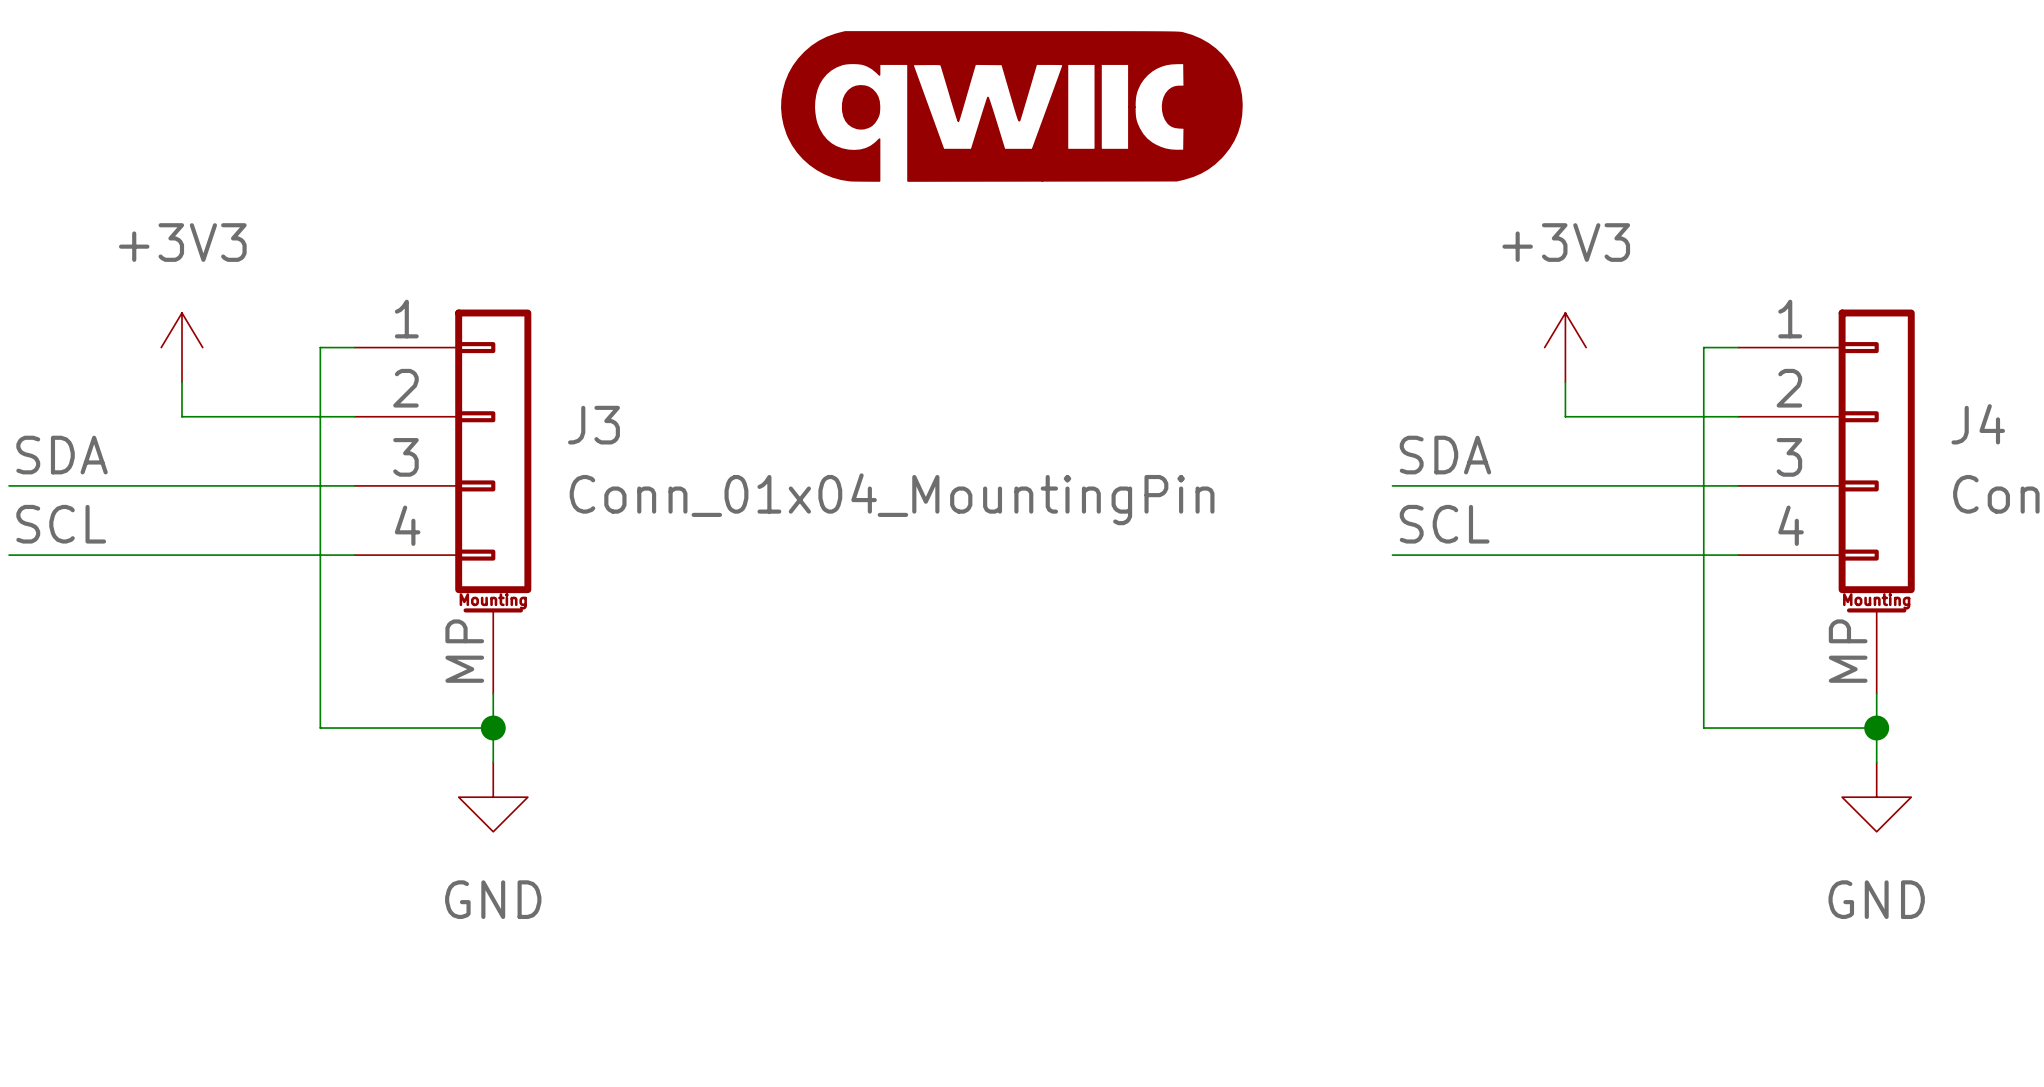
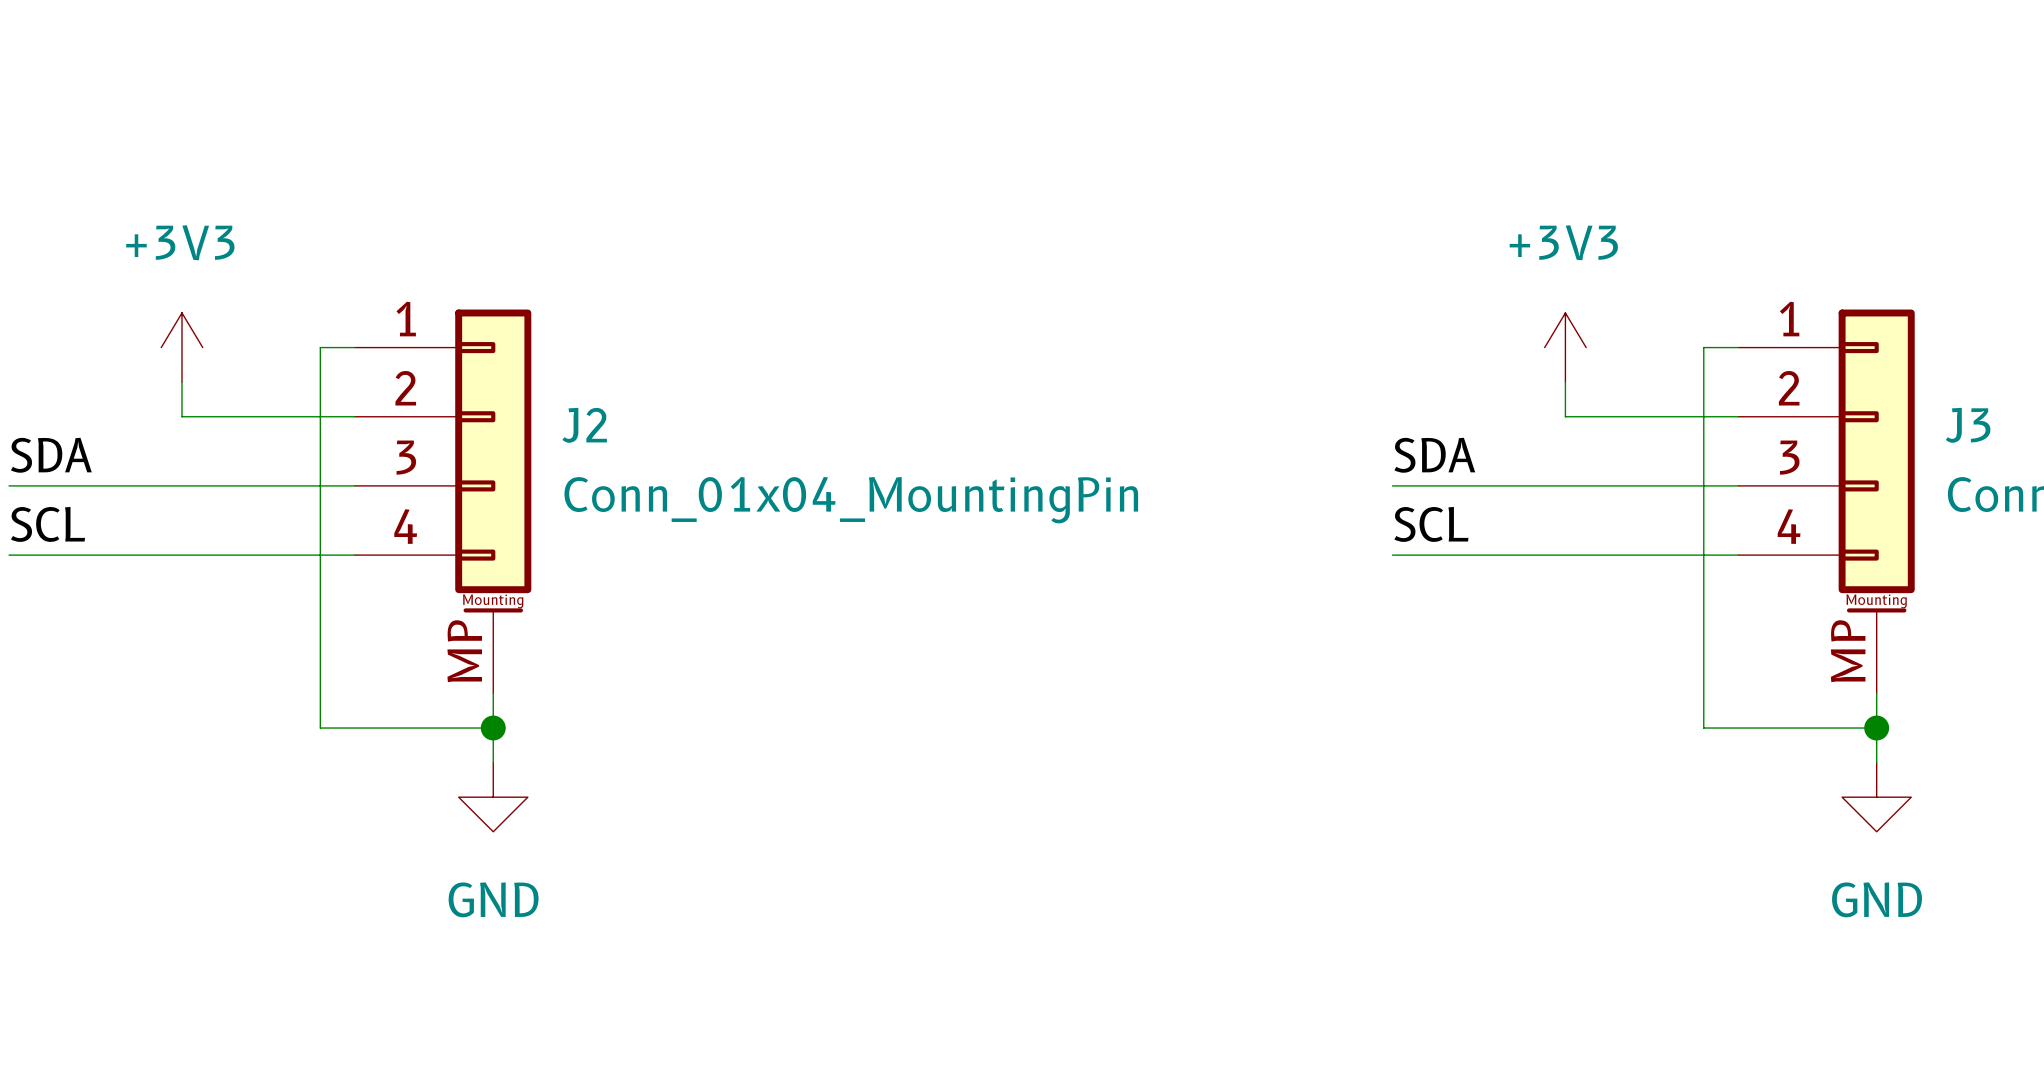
part: (1011, 106) -> none
J4 name: J4 (1978, 424) -> J3 (1968, 425)
J3 name: J3 (593, 425) -> J2 (584, 425)

